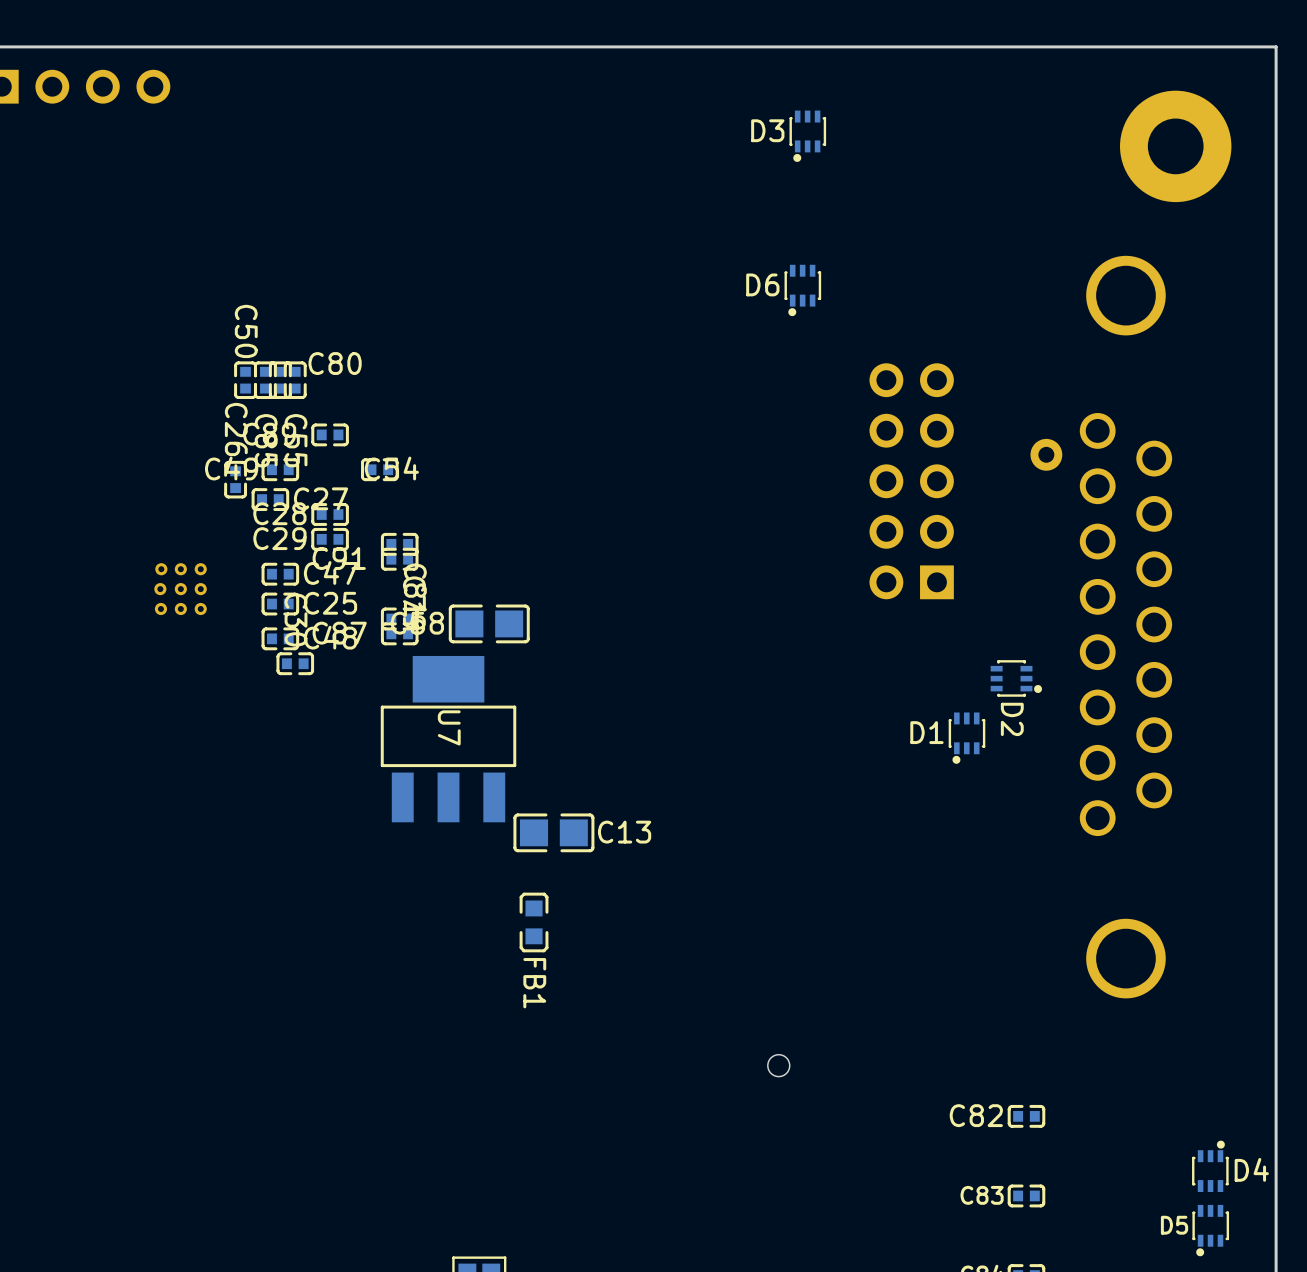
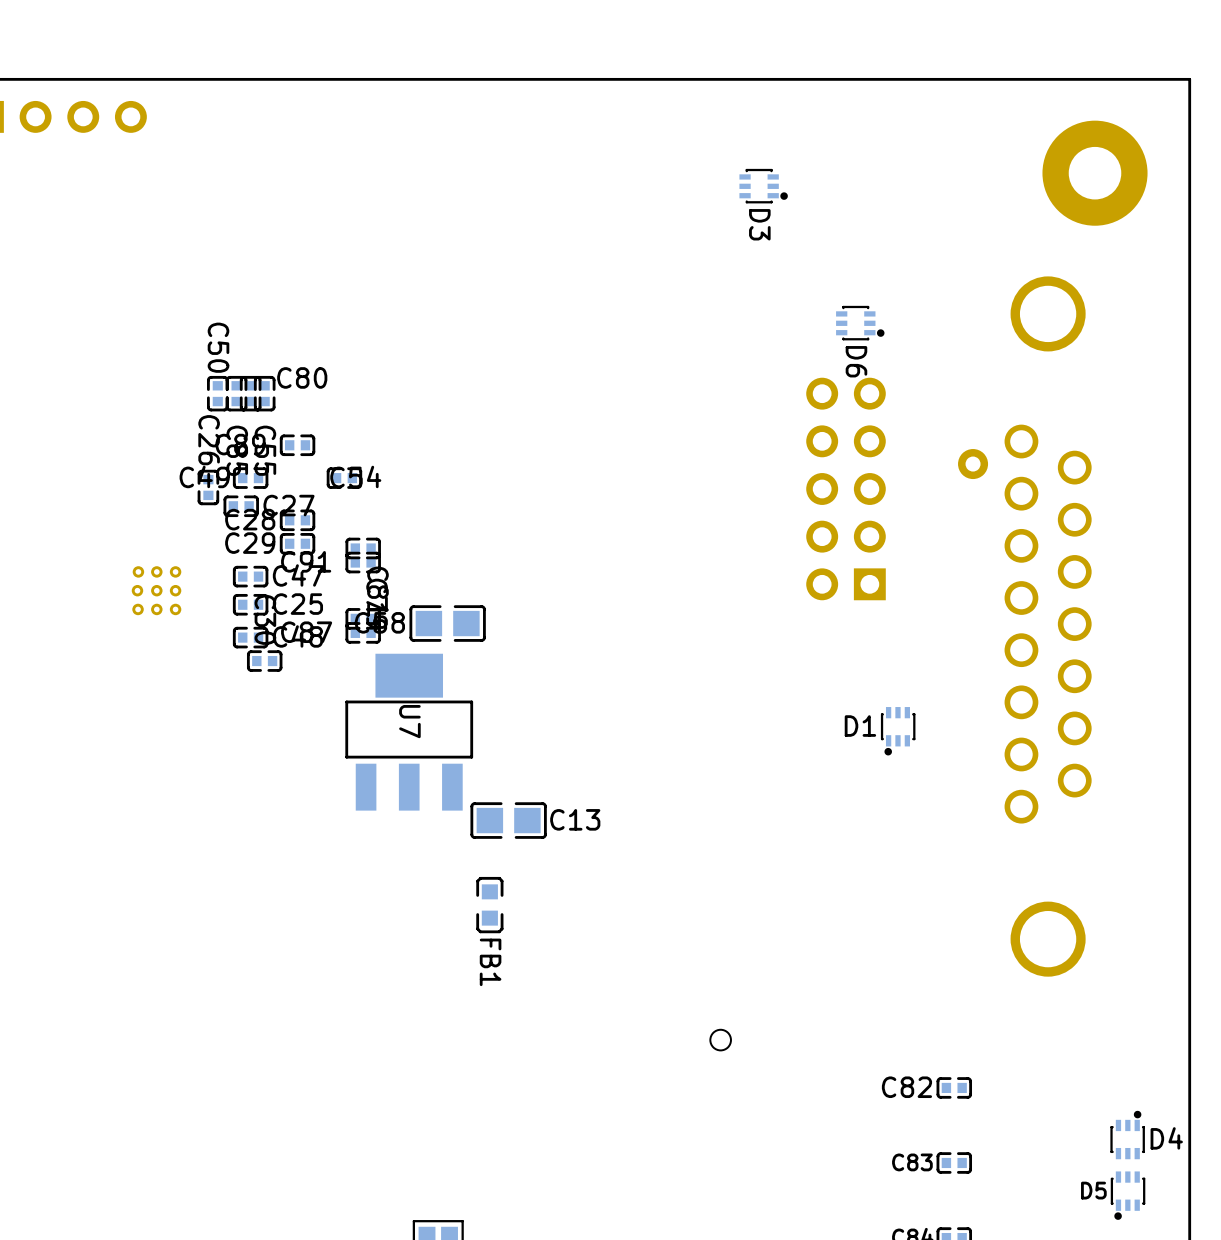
D3 rotation: 0° (807, 136) -> 90° counterclockwise (763, 186)
D6 rotation: 0° (802, 290) -> 90° counterclockwise (860, 323)
D6 position: (802, 290) -> (860, 323)
D2: (1016, 678) -> none

